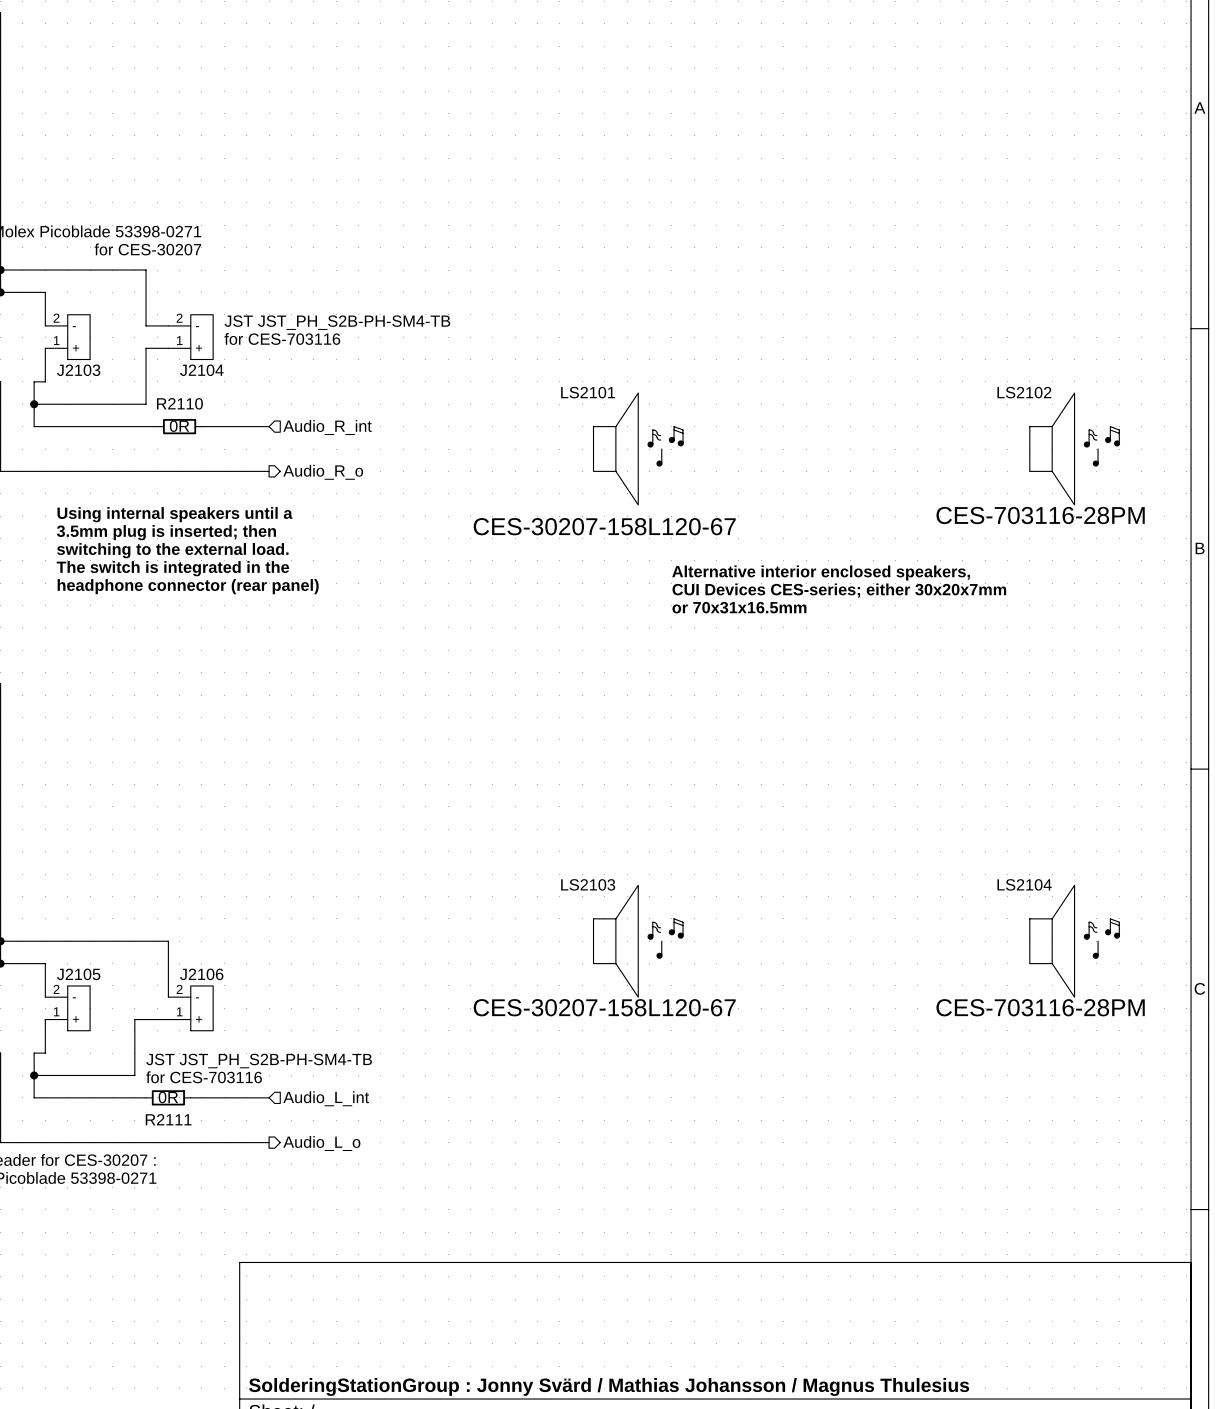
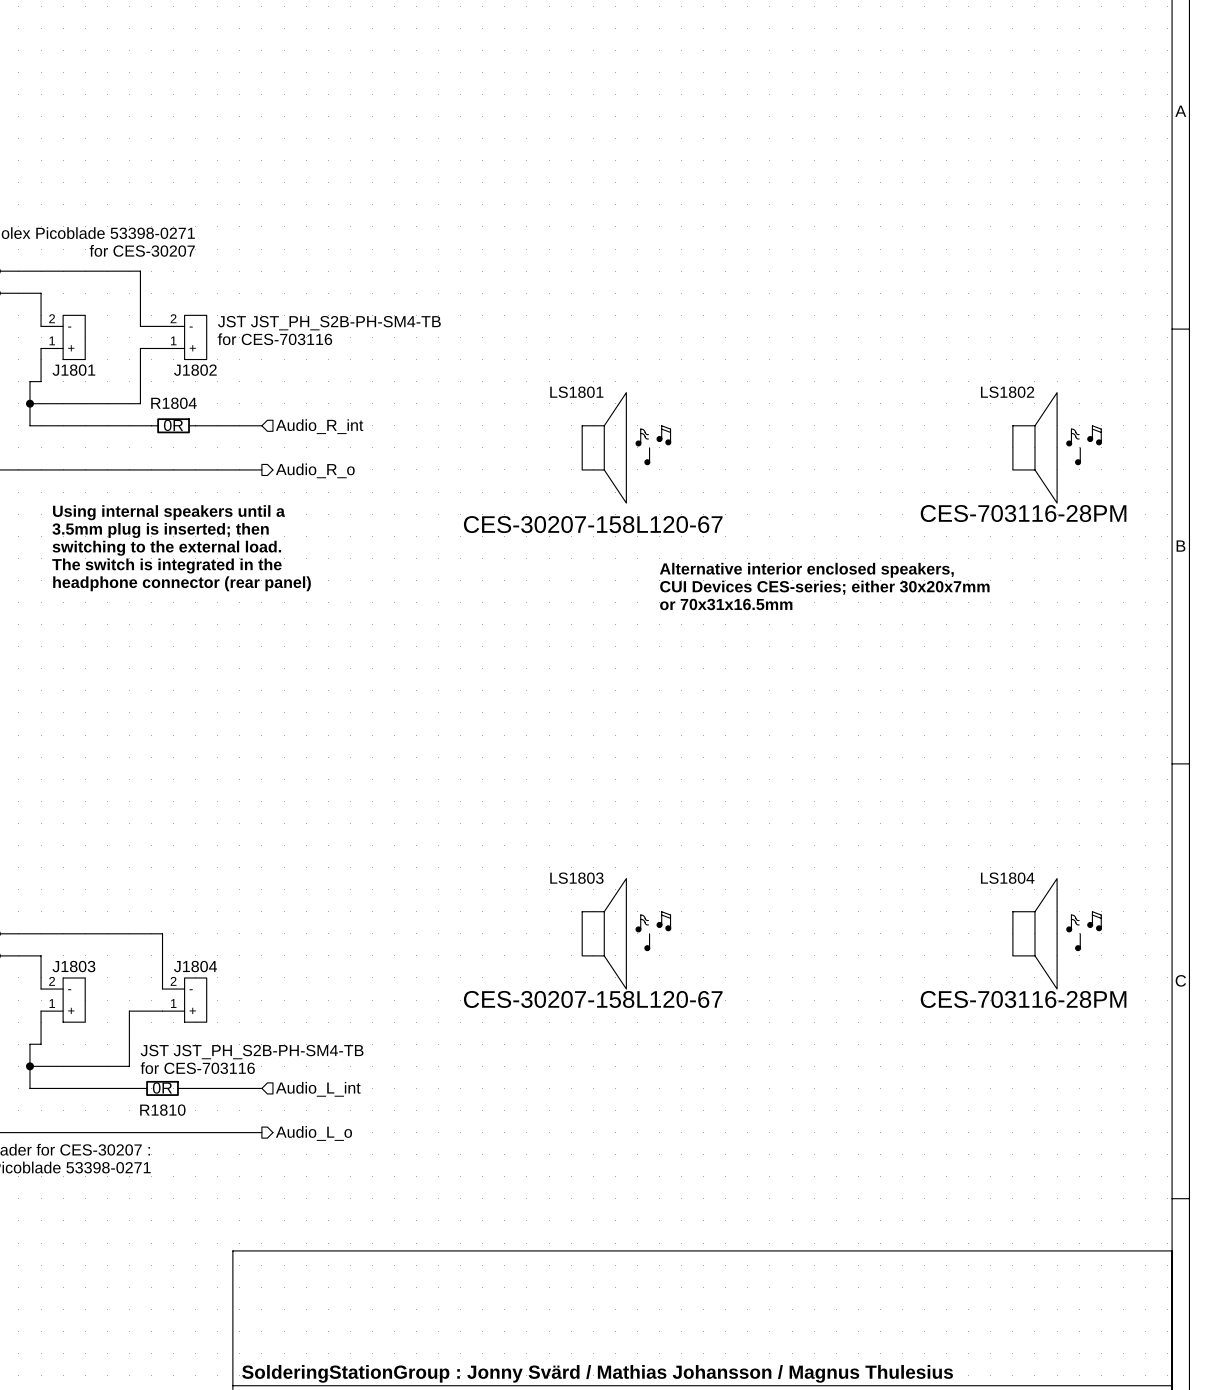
J2103 name: J2103 (78, 370) -> J1801 (73, 370)
J2104 name: J2104 (201, 370) -> J1802 (195, 370)
LS2101 name: LS2101 (588, 392) -> LS1801 (576, 392)
LS2102 name: LS2102 (1024, 392) -> LS1802 (1007, 392)
R2110 name: R2110 (179, 403) -> R1804 (173, 403)
LS2103 name: LS2103 (588, 884) -> LS1803 (576, 878)
LS2104 name: LS2104 (1024, 884) -> LS1804 (1007, 878)
J2105 name: J2105 (78, 974) -> J1803 (73, 966)
J2106 name: J2106 (201, 974) -> J1804 (195, 966)
R2111 name: R2111 (168, 1119) -> R1810 (162, 1110)

